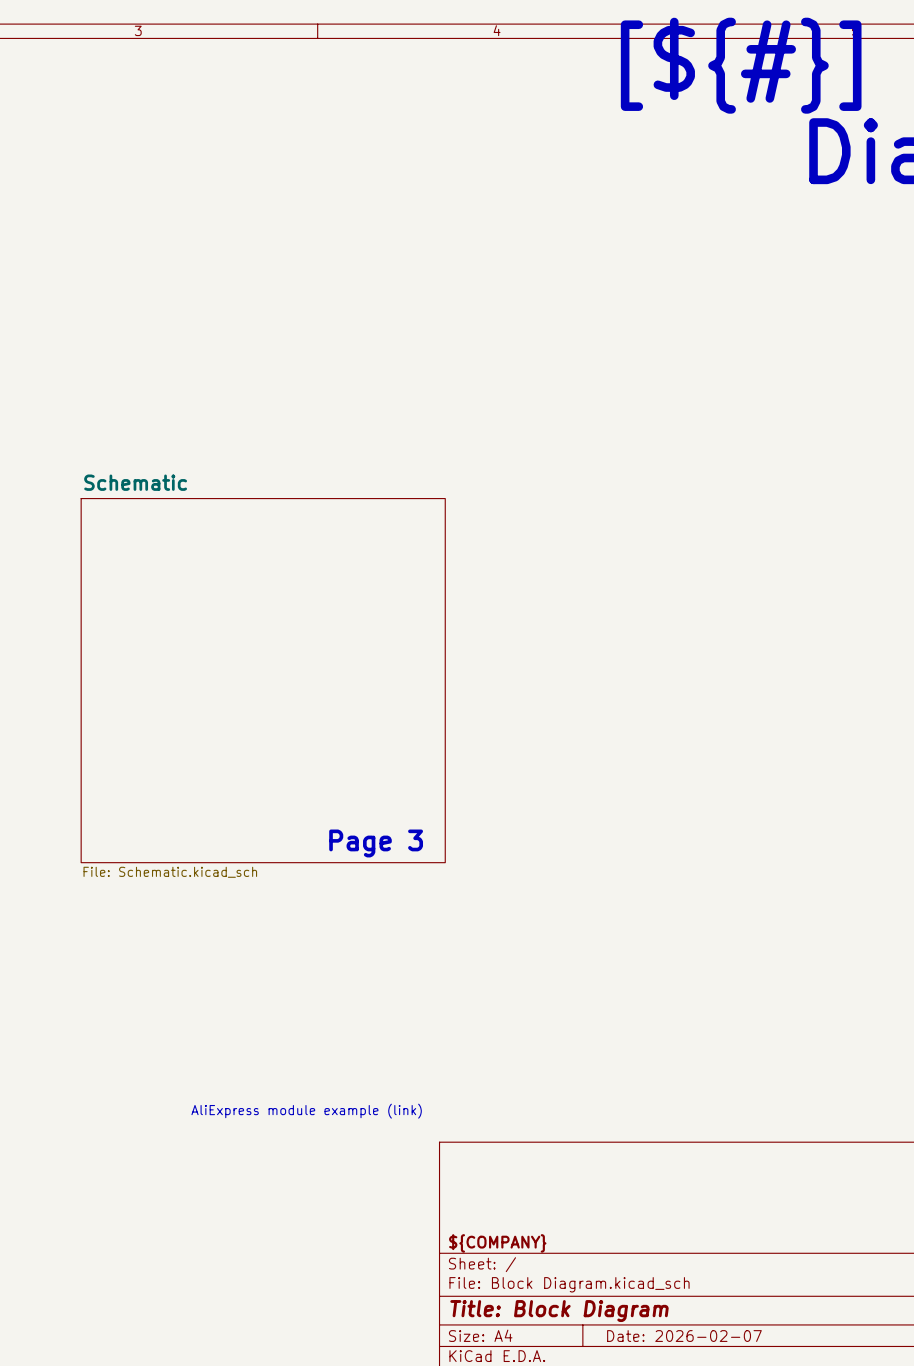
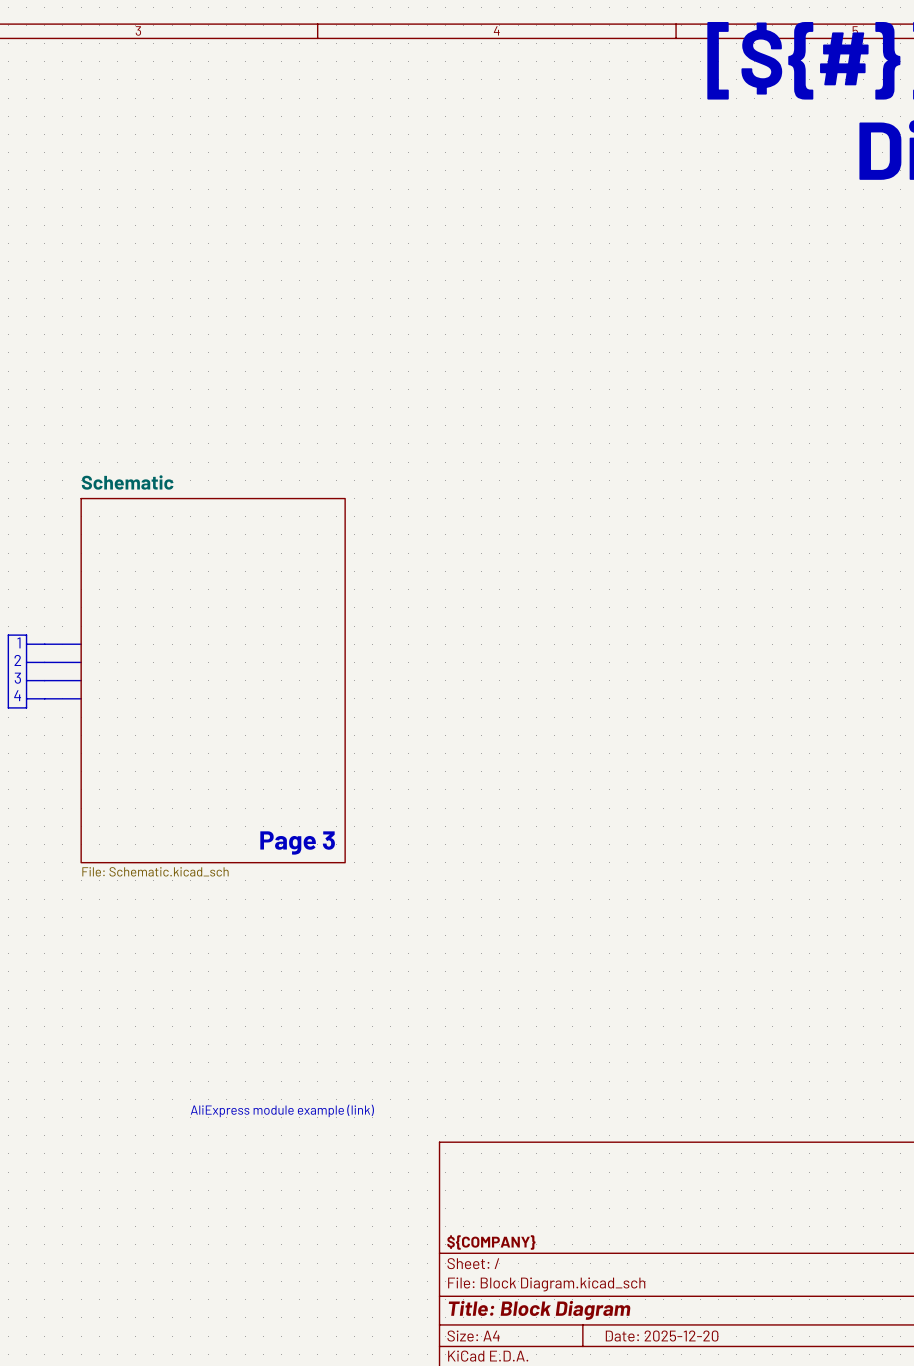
line: none -> (8, 635) (26, 635) (26, 707) (8, 707) (8, 635)
text: none -> 1 (18, 642)
line: none -> (26, 644) (81, 644)
text: none -> 2 (17, 660)
line: none -> (26, 662) (81, 662)
text: none -> 3 (17, 678)
line: none -> (26, 680) (81, 680)
sheet Schematic: none -> File: Schematic.kicad_sch (213, 680)
sheet Schematic: File: Schematic.kicad_sch (263, 680) -> none
text: none -> 4 (17, 695)
line: none -> (26, 698) (81, 698)
text position: Page 3 (376, 843) -> Page 3 (297, 842)
title block: Date: 2026-02-07 (684, 1336) -> Date: 2025-12-20 (662, 1336)

